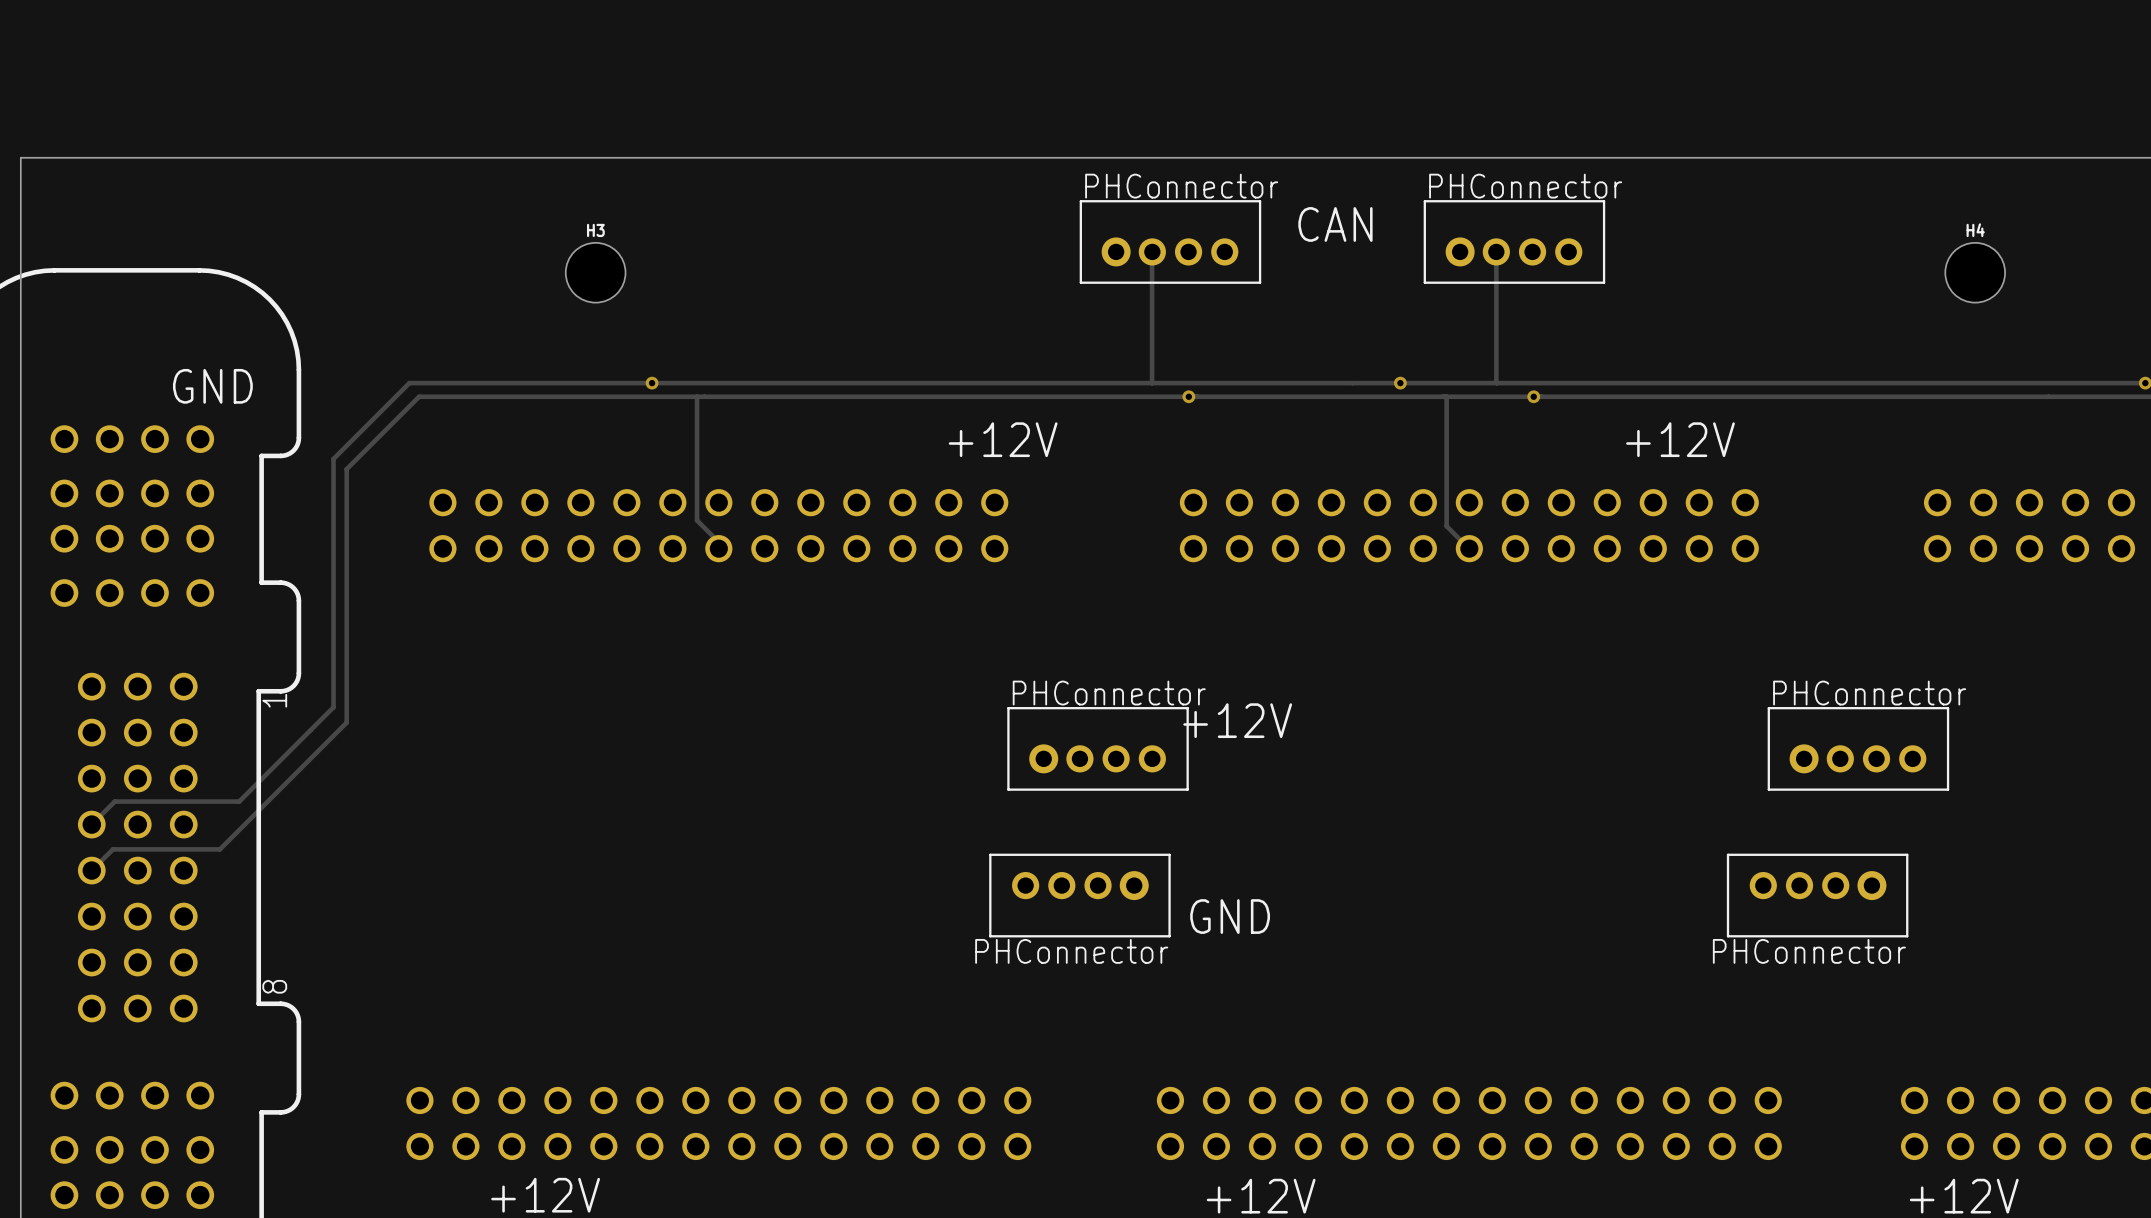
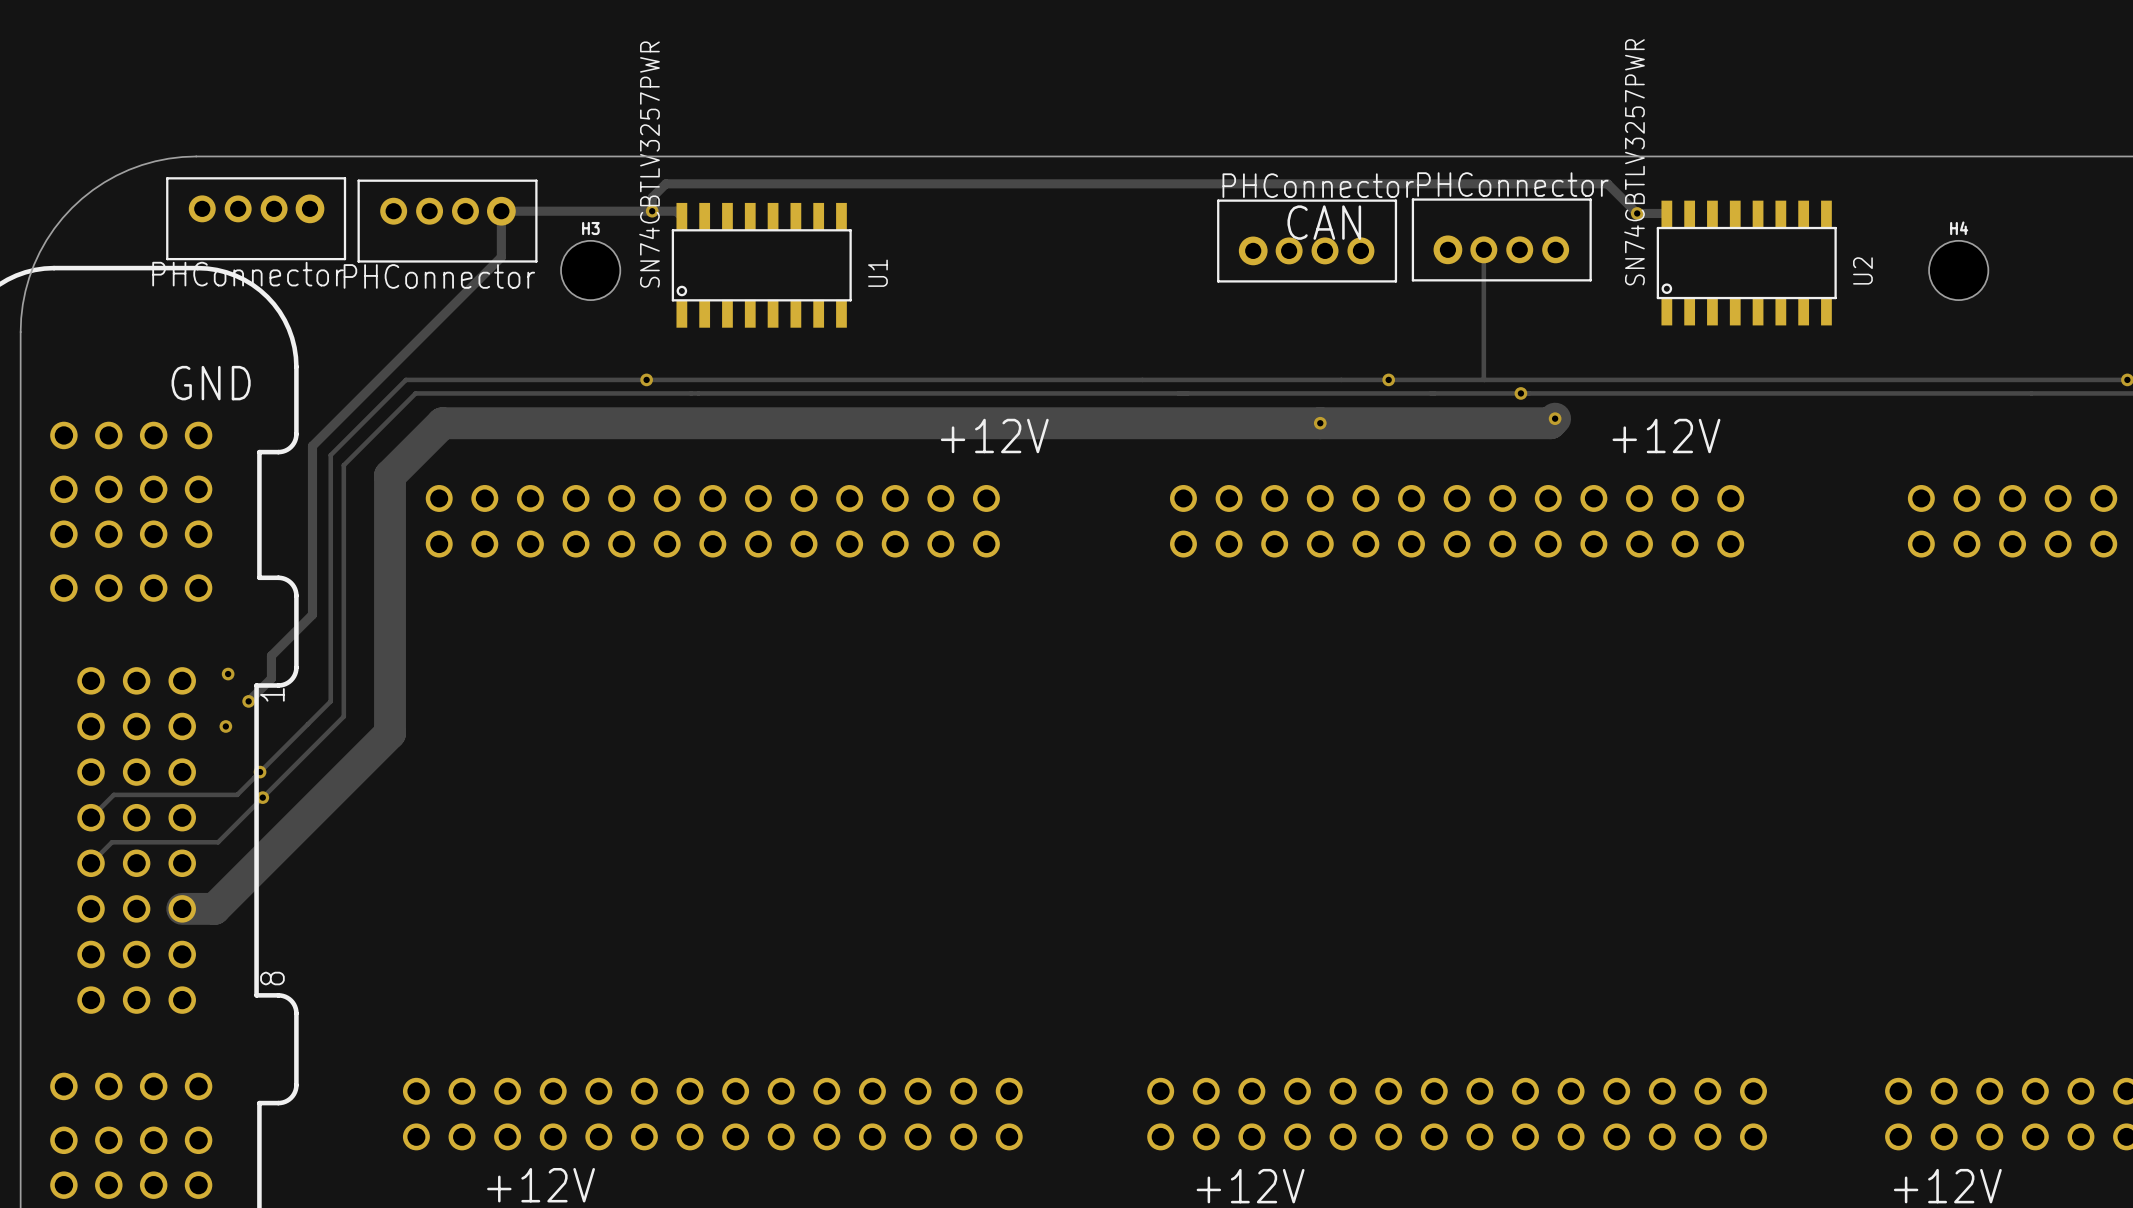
board edge: (197, 157) (20, 157) (20, 334) -> (196, 156) (155, 161) (129, 169) (93, 189) (72, 207) (54, 228) (34, 264) (25, 291) (20, 332)
track: none -> (652, 211) (652, 197) (665, 183) (1607, 183) (1637, 213) (1666, 214)
via: none -> (652, 211)
via: none -> (1637, 213)
track: none -> (681, 216) (676, 211) (501, 211) (501, 257) (312, 446) (312, 614) (271, 655) (271, 678) (248, 701)
part: none -> (256, 218)
part: none -> (447, 221)
part position: (1170, 241) -> (1307, 241)
track: (1152, 251) (1152, 383) -> none
U2: none -> SN74CBTLV3257PWR (1746, 263)
U1: none -> SN74CBTLV3257PWR (761, 265)
track: (697, 396) (697, 520) (718, 542) (718, 548) -> none
via: (1188, 396) -> none
track: (1446, 396) (1446, 526) (1469, 548) -> none
track: none -> (1555, 418) (1550, 423) (442, 423) (390, 475) (390, 733) (214, 908) (182, 908)
via: none -> (1555, 418)
via: none -> (1320, 423)
via: none -> (228, 674)
via: none -> (248, 701)
text: +12V (1237, 720) -> none
via: none -> (225, 726)
part: (1098, 748) -> none
part: (1858, 748) -> none
via: none -> (260, 772)
via: none -> (262, 797)
part: (1079, 895) -> none
part: (1817, 895) -> none
text: GND (1230, 916) -> none

